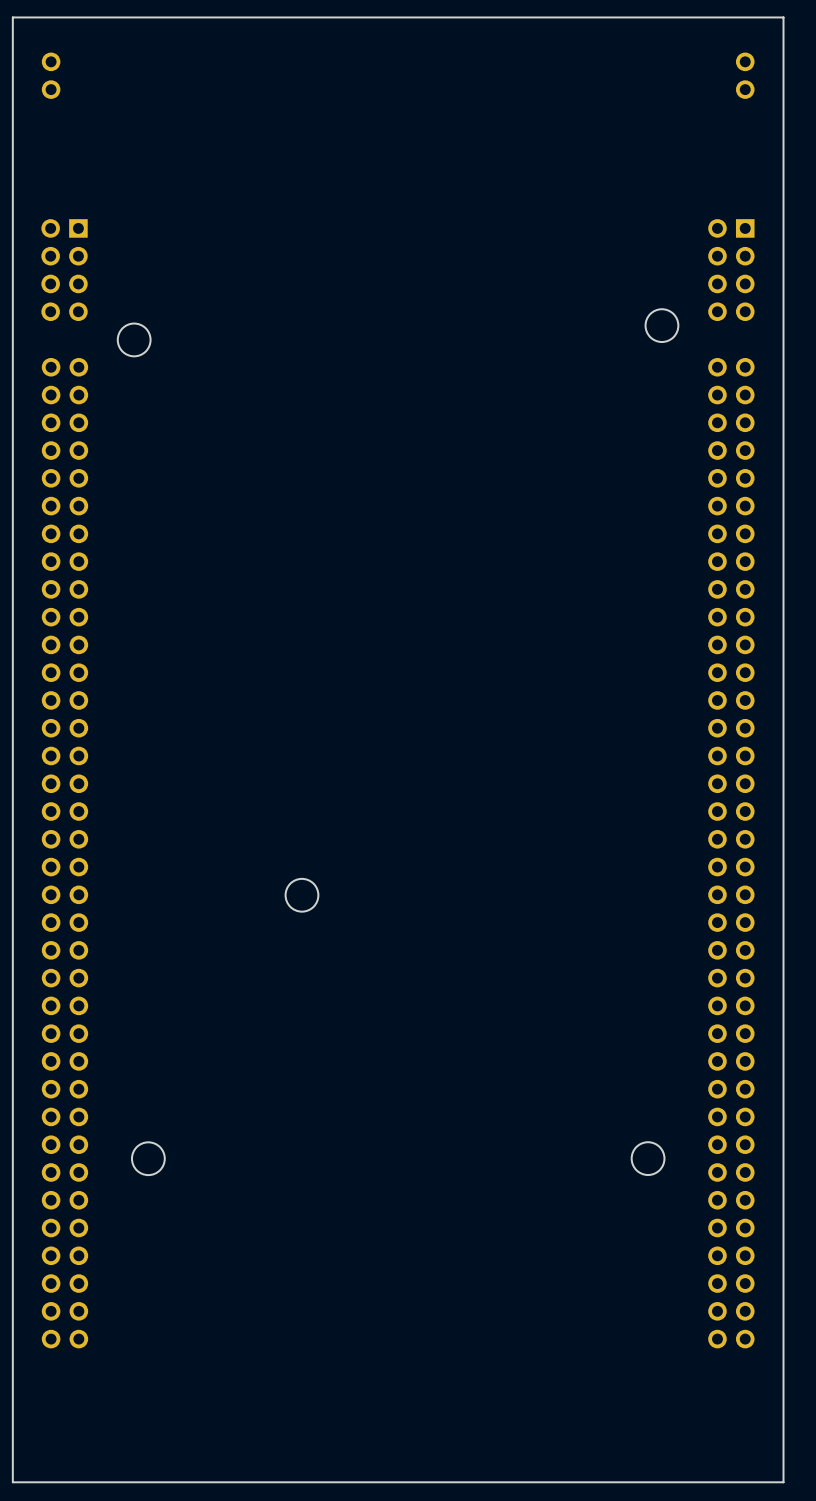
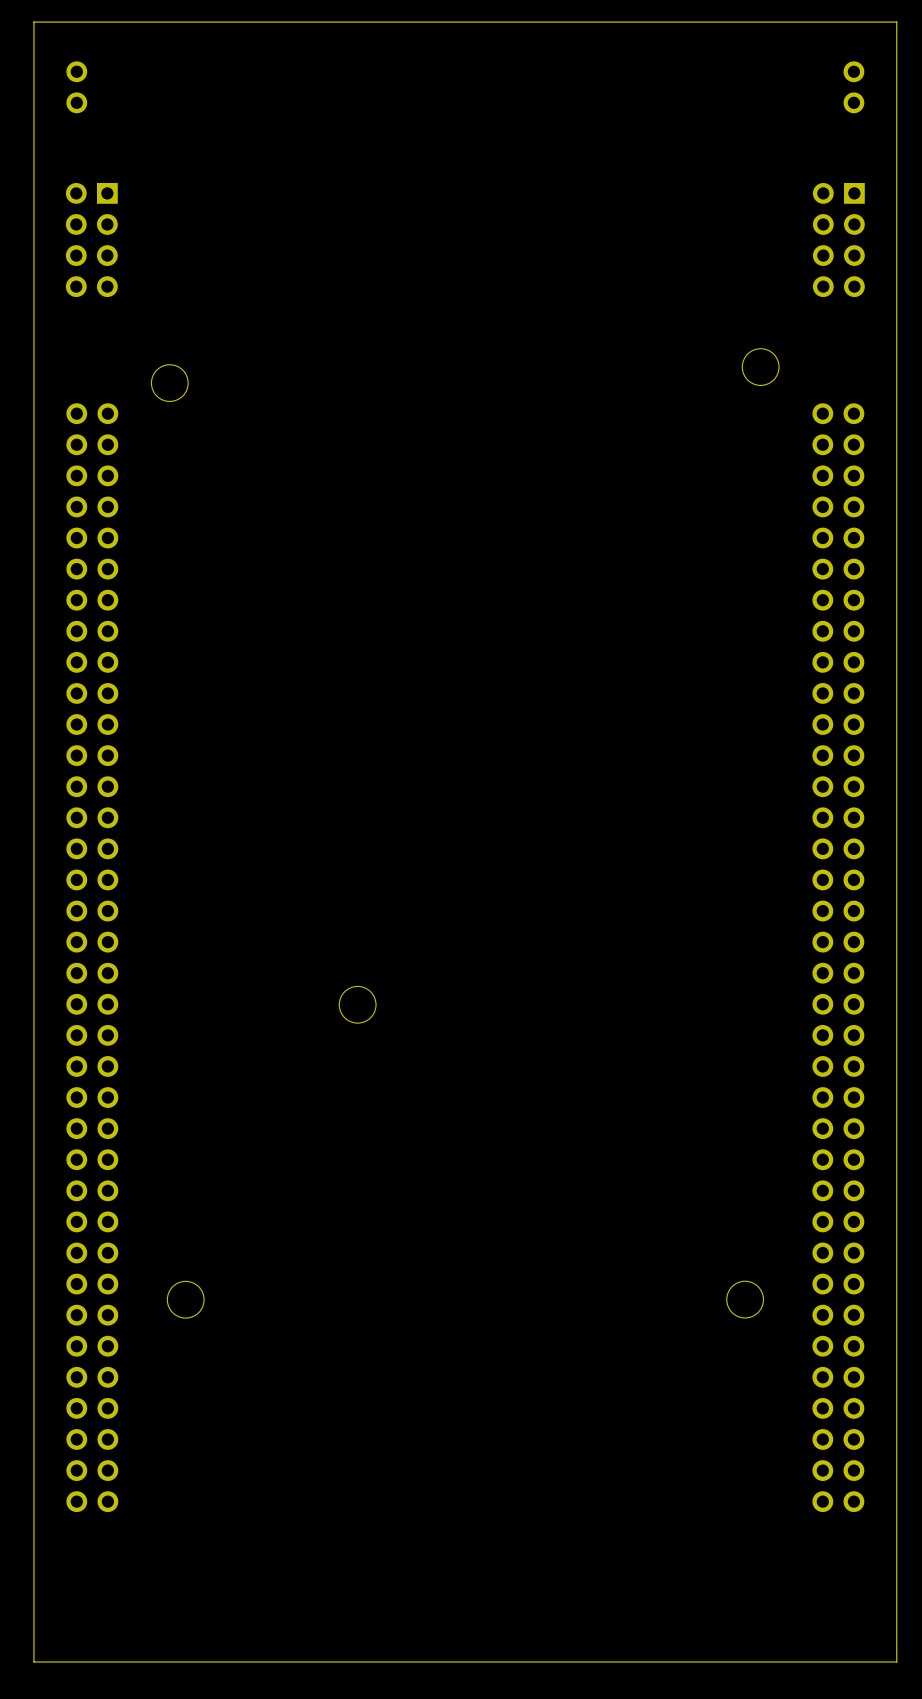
part position: (64, 270) -> (91, 240)
part position: (731, 270) -> (838, 240)

